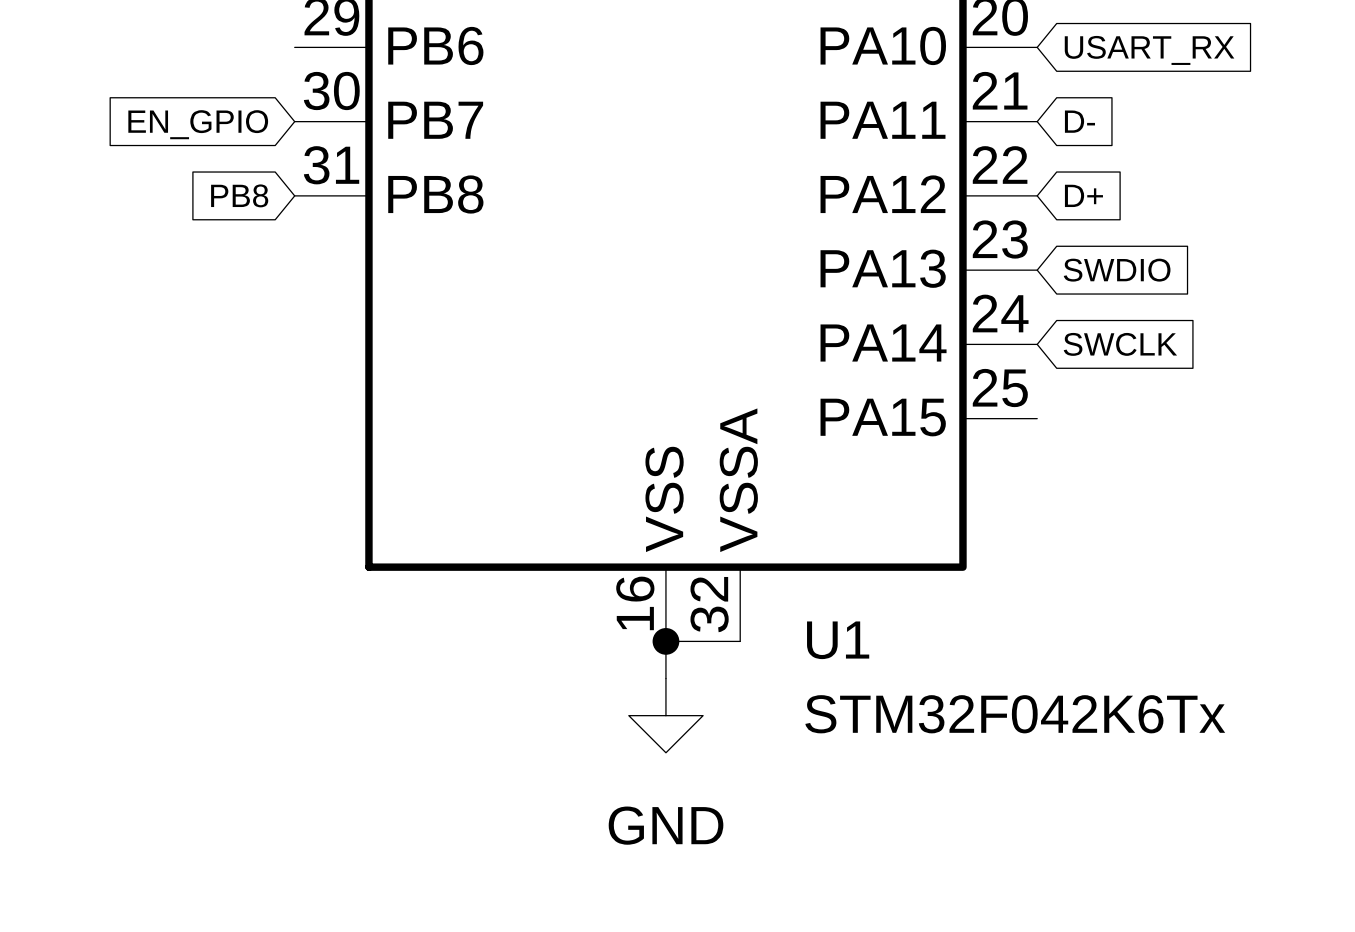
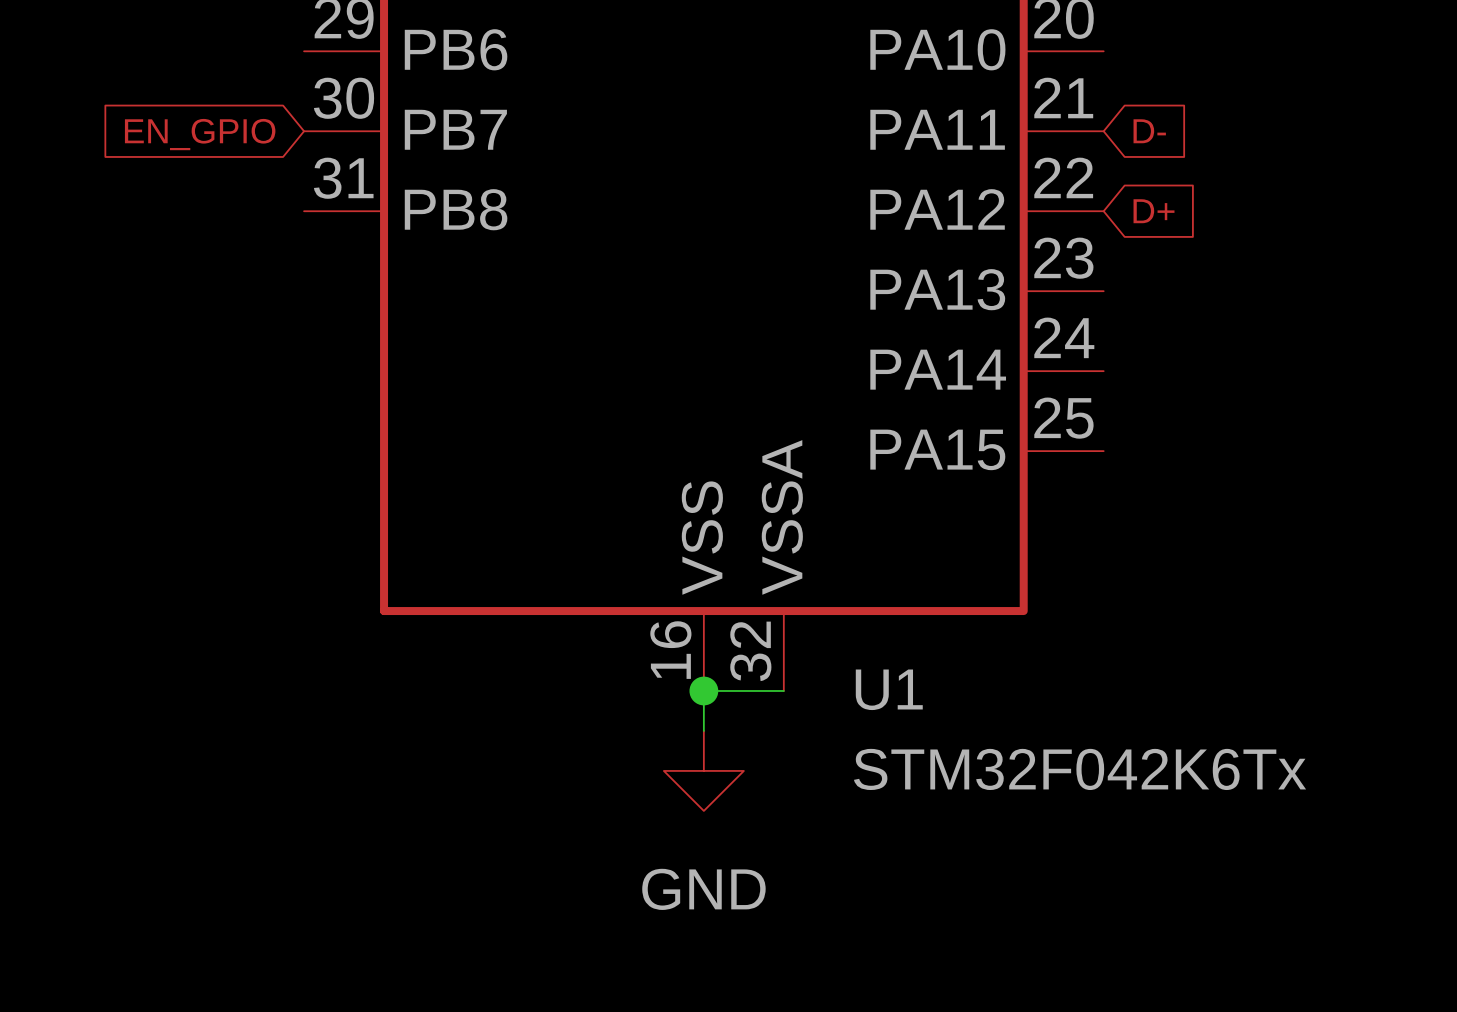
global label: USART_RX (1149, 50) -> none
global label: PB8 (239, 195) -> none
global label: SWDIO (1117, 270) -> none
global label: SWCLK (1120, 344) -> none

